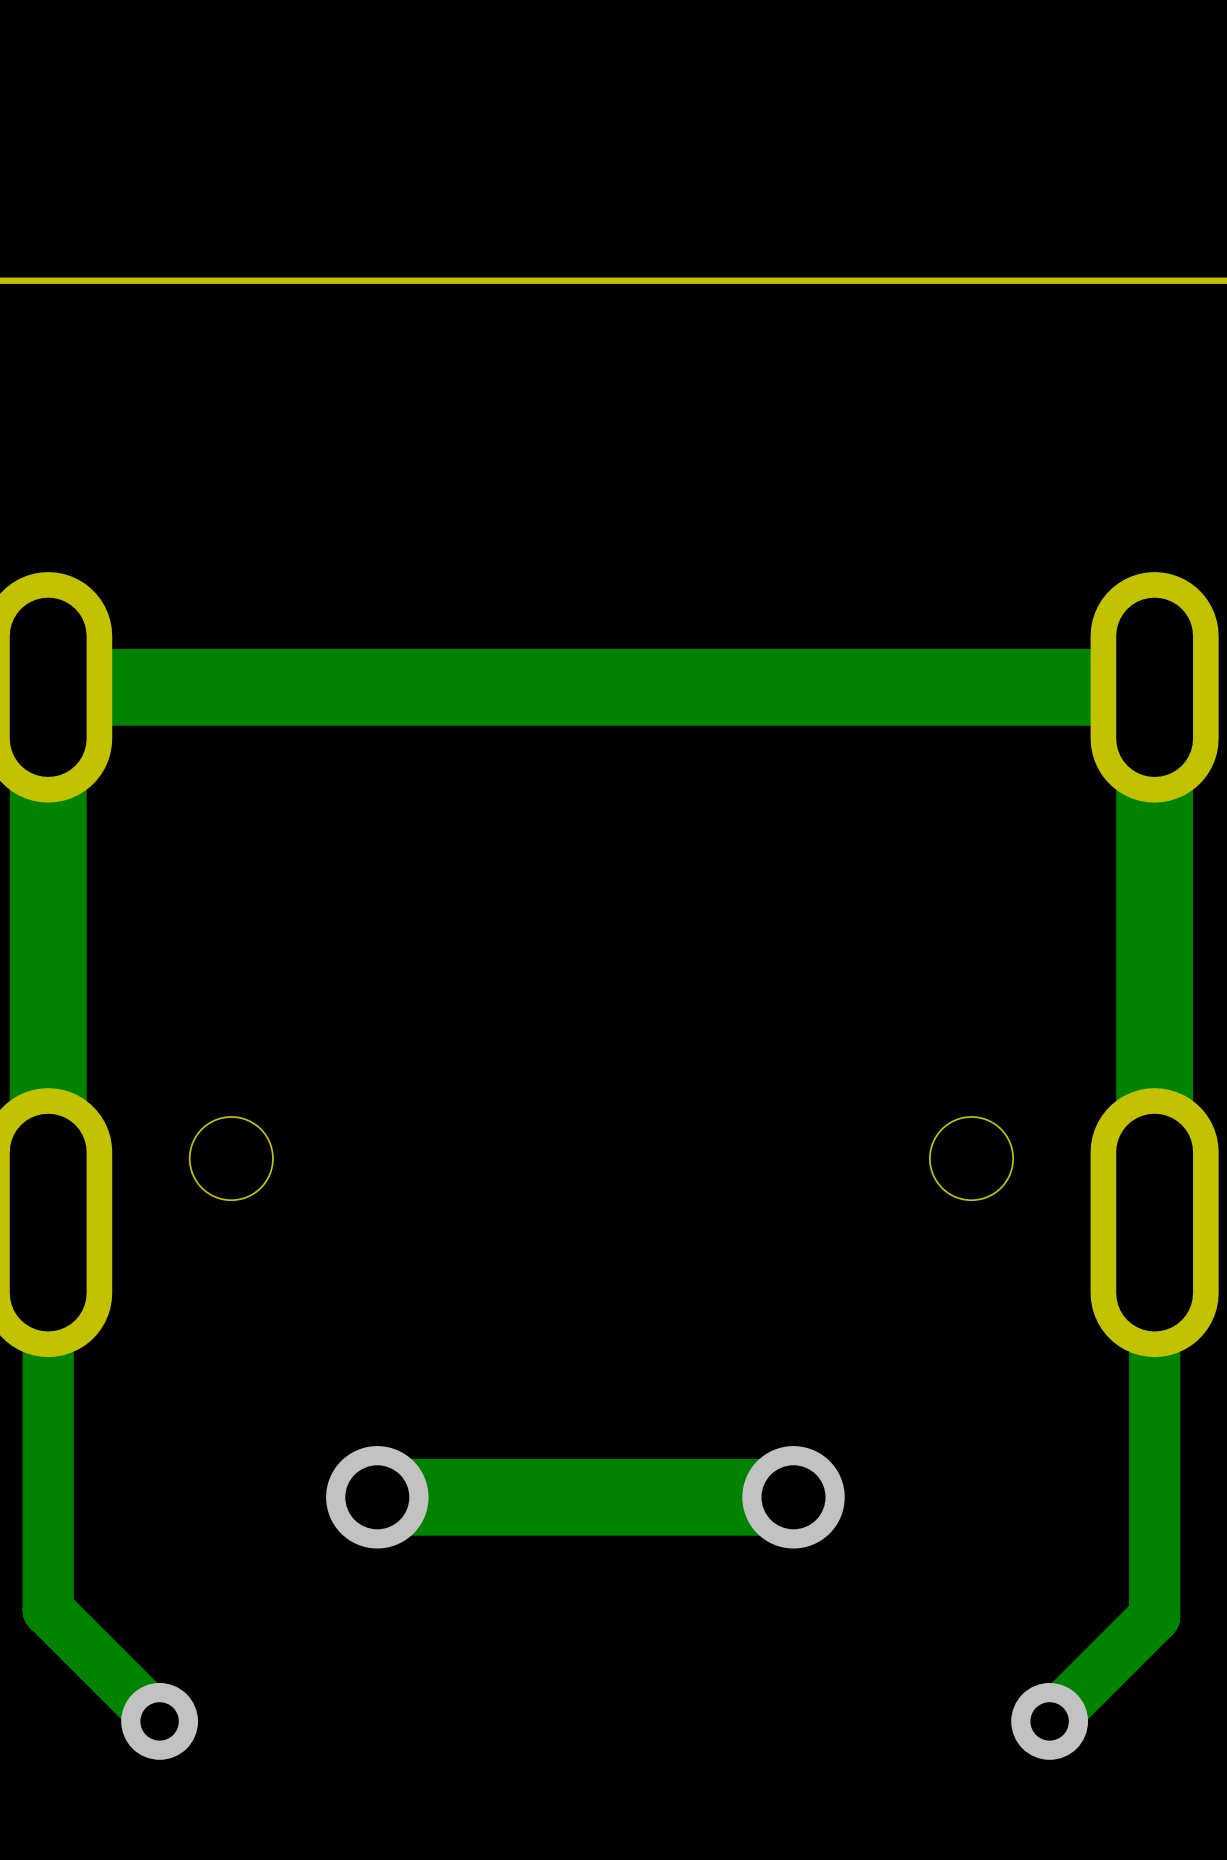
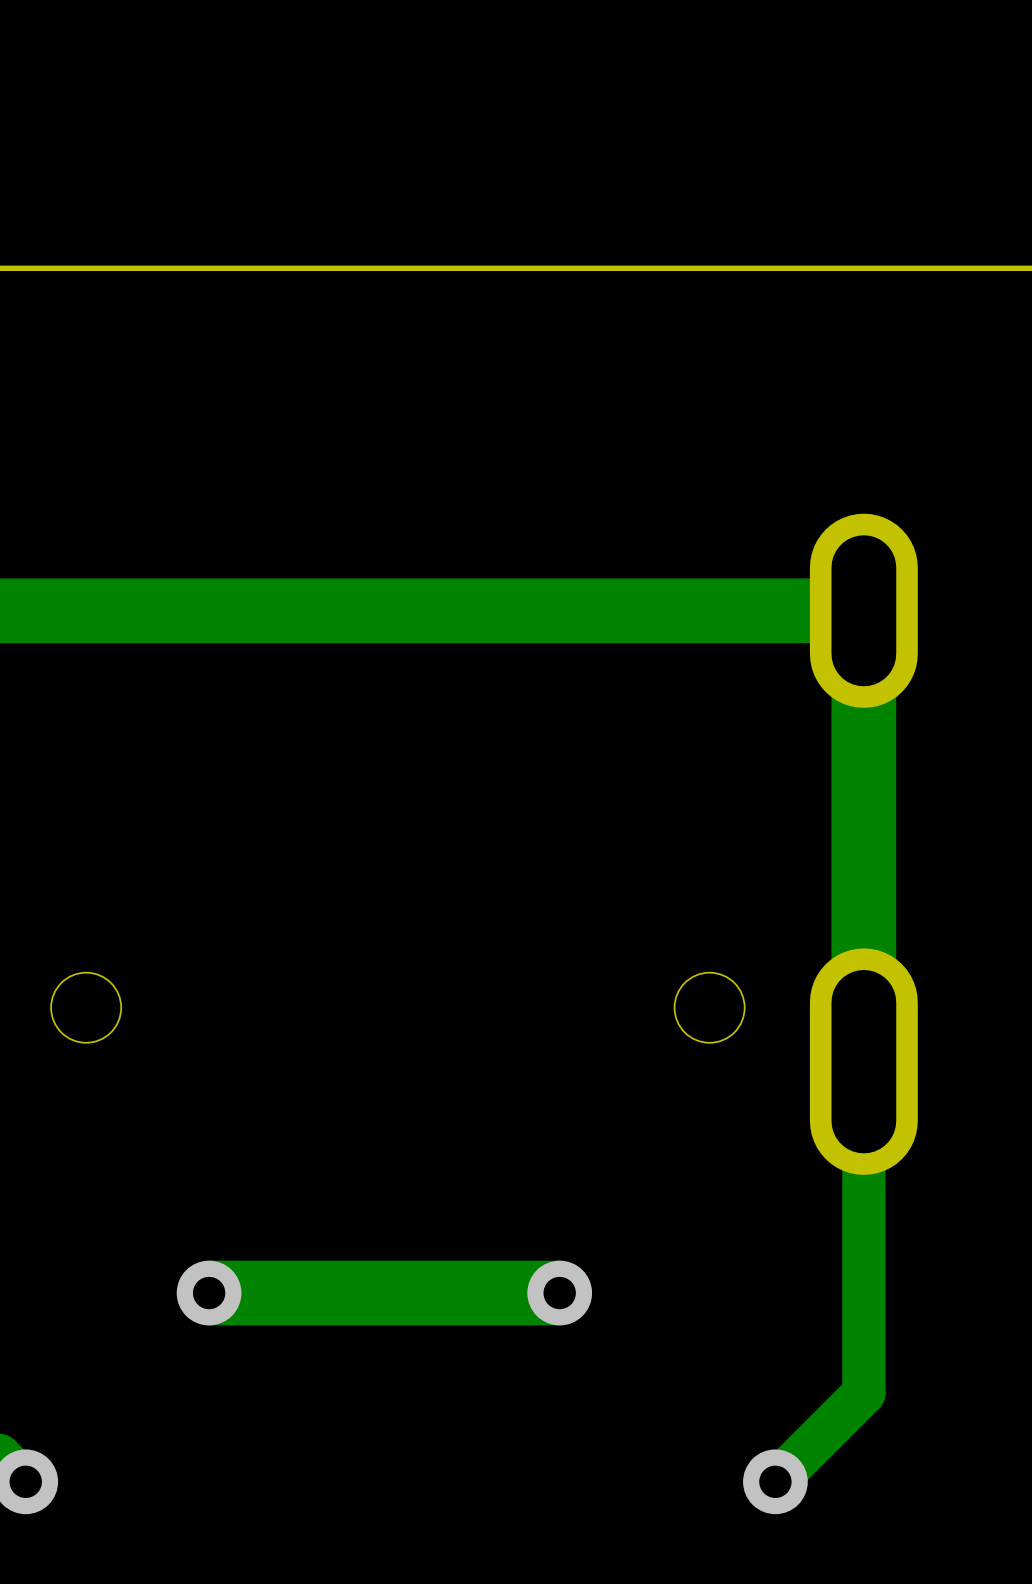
via size: [326, 1446, 429, 1549] -> [176, 1260, 242, 1326]
via size: [742, 1446, 845, 1549] -> [527, 1260, 593, 1326]

